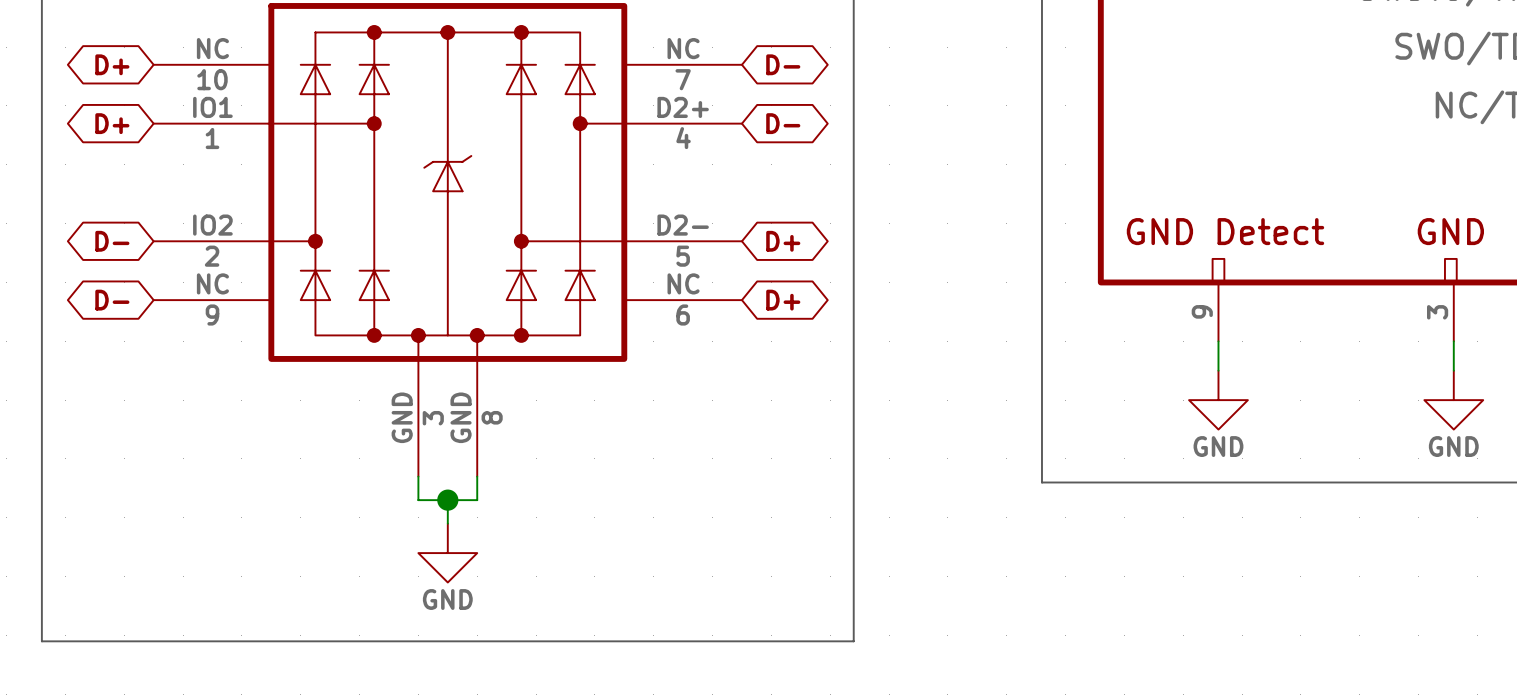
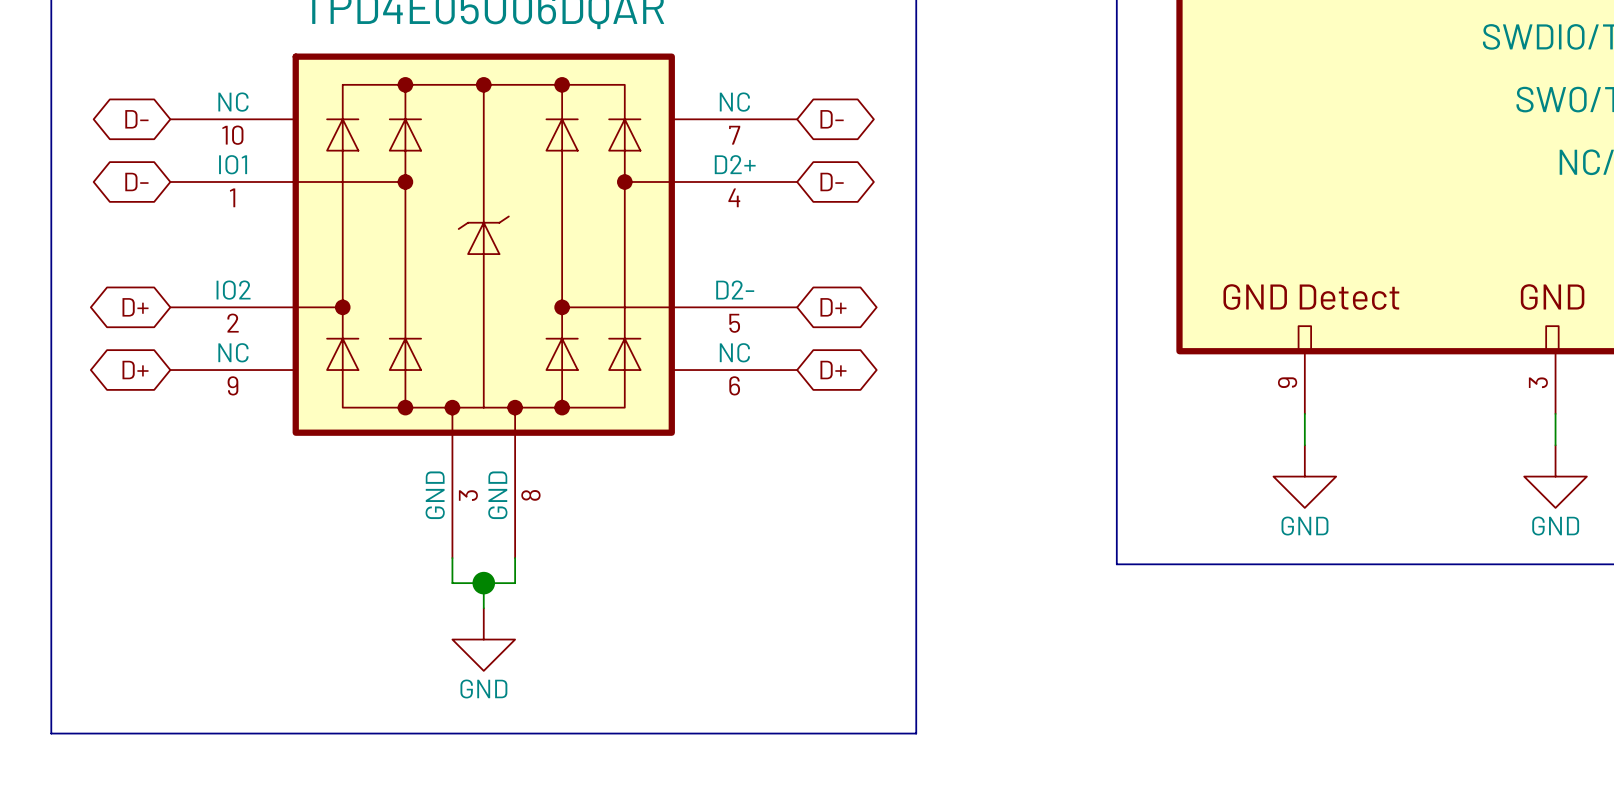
global label: D+ (112, 64) -> D- (136, 119)
global label: D+ (112, 123) -> D- (136, 181)
global label: D- (112, 241) -> D+ (135, 307)
global label: D- (112, 300) -> D+ (135, 370)

